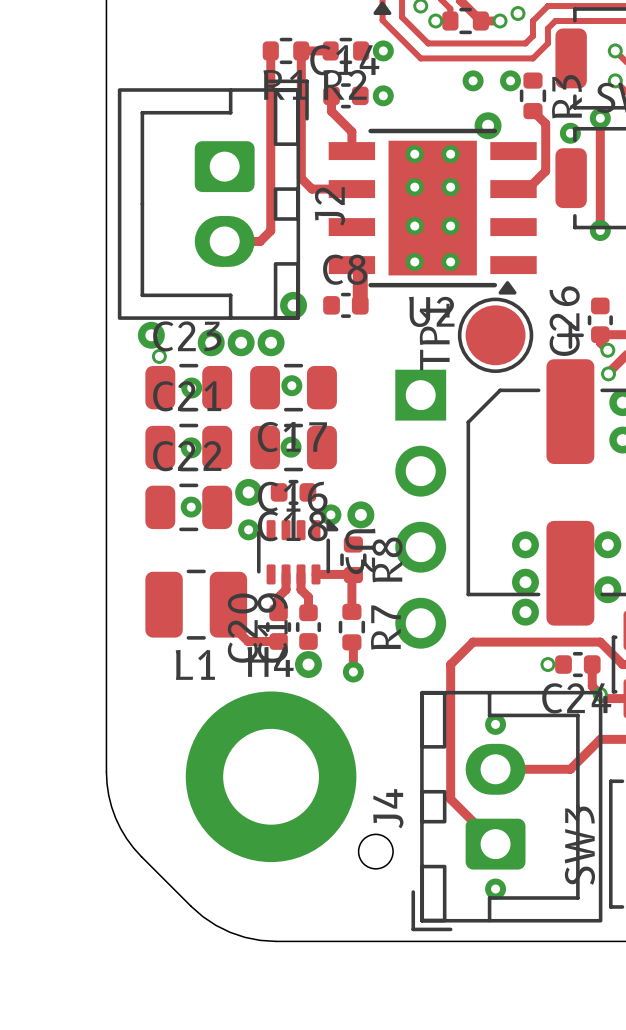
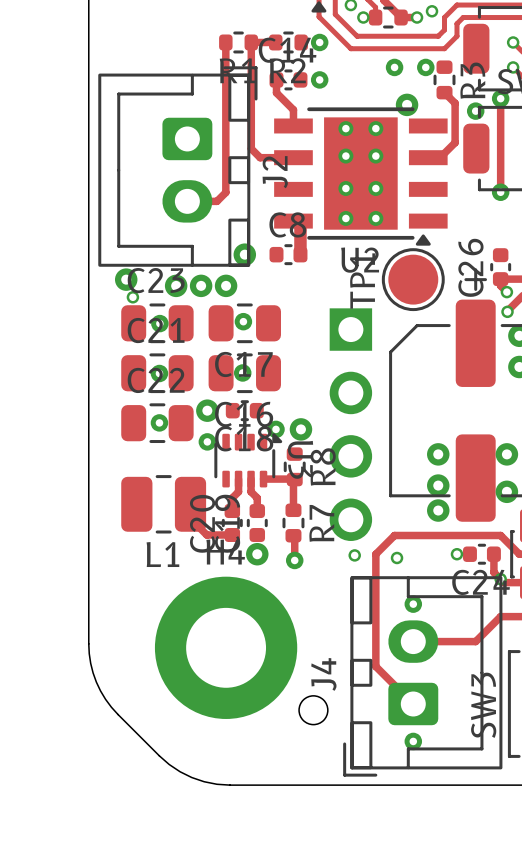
via: none -> (354, 555)
via: none -> (397, 557)

